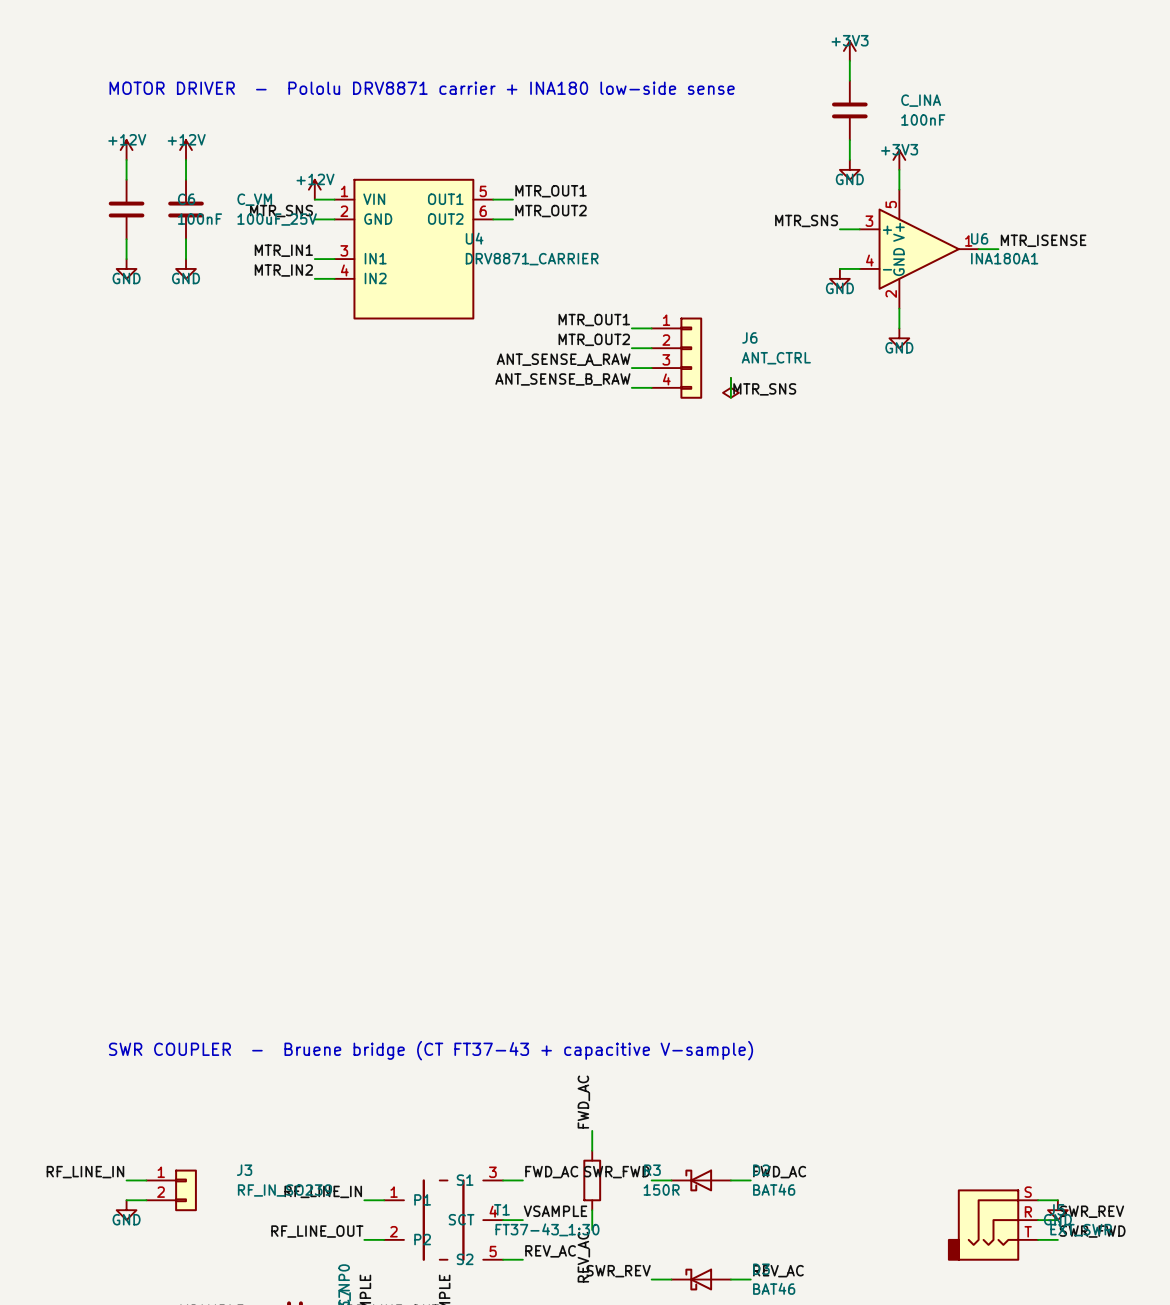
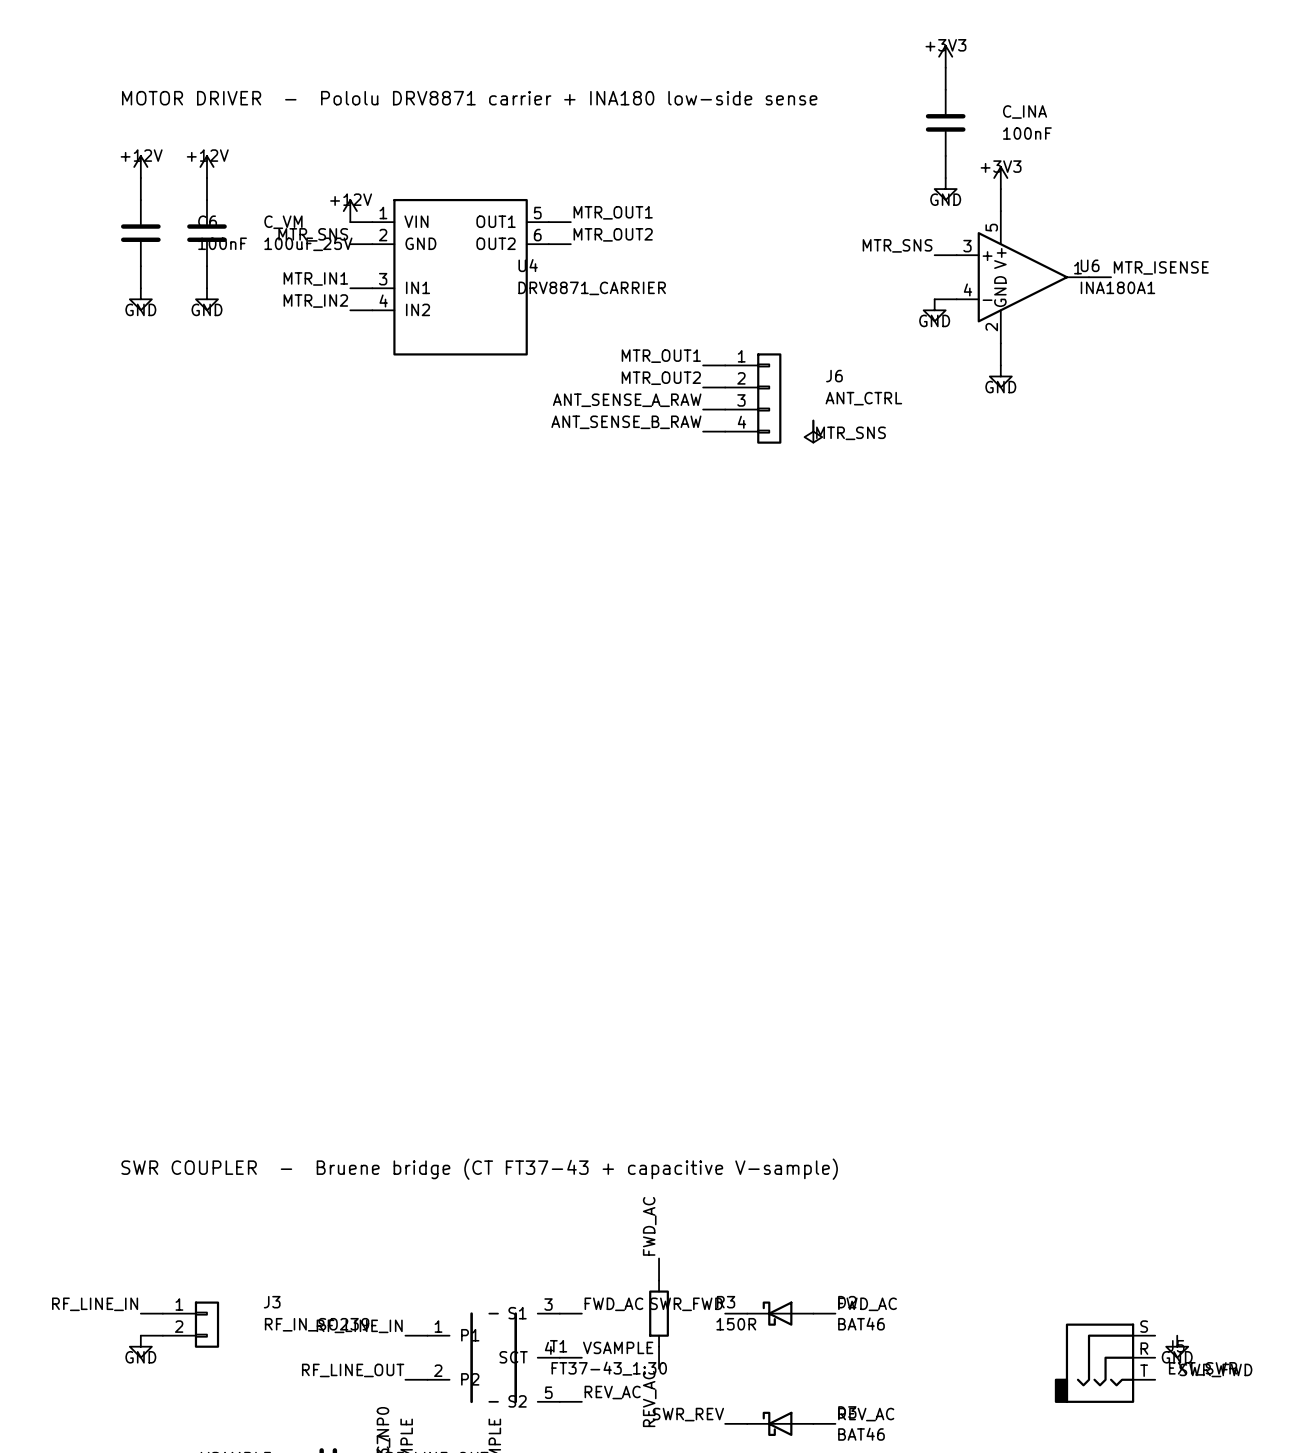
wire: (1038, 1200) (1057, 1200) -> none
label: SWR_REV (1091, 1211) -> none
wire: (1038, 1220) (1057, 1220) -> none
wire: (1038, 1239) (1057, 1239) -> none

